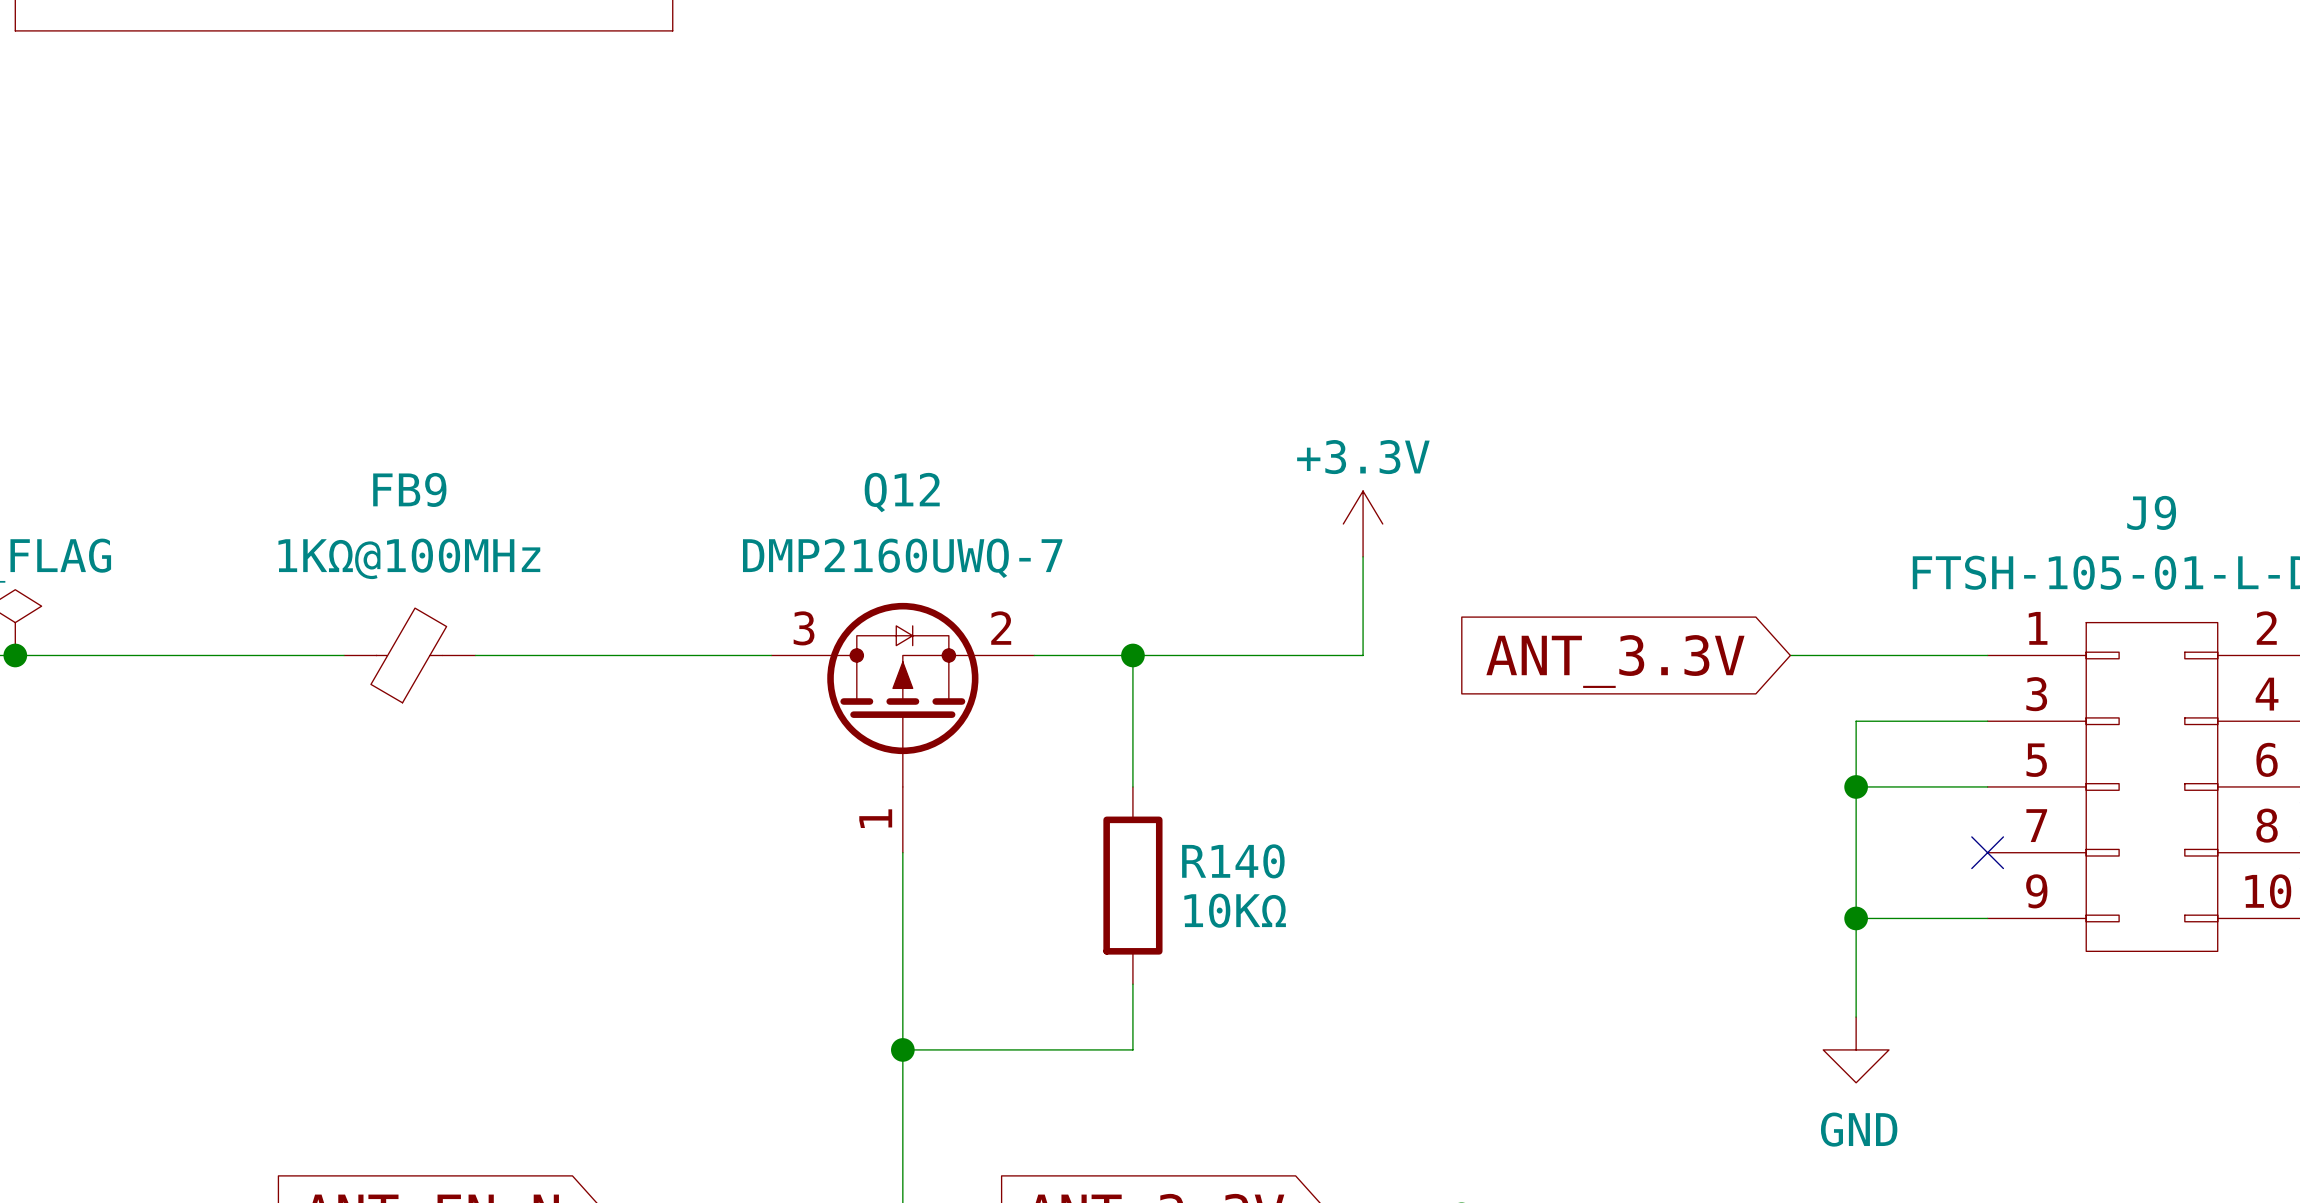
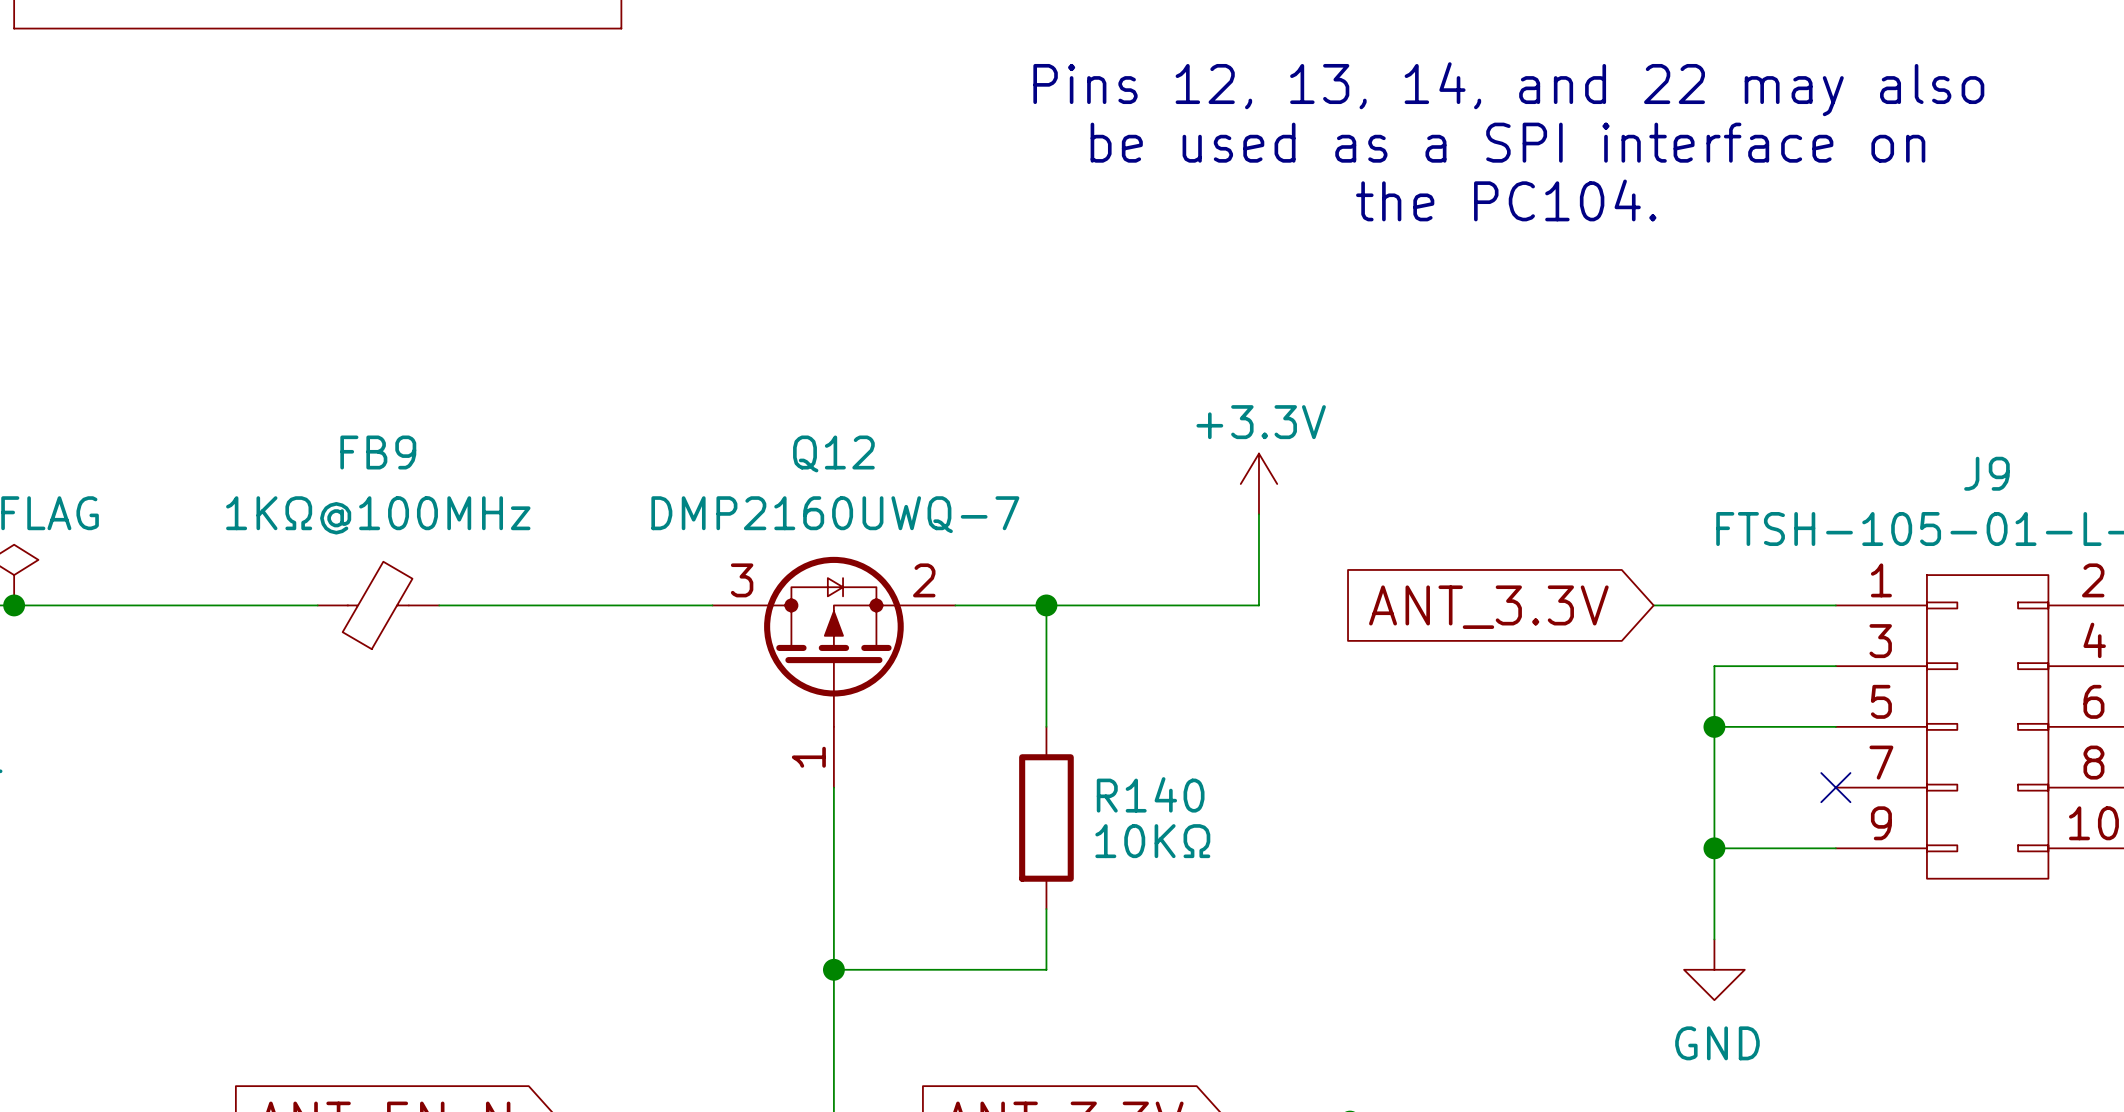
text: none -> Pins 12, 13, 14, and 22 may also (1508, 89)
text: none -> be used as a SPI interface on (1507, 142)
text: none -> the PC104. (1506, 200)

